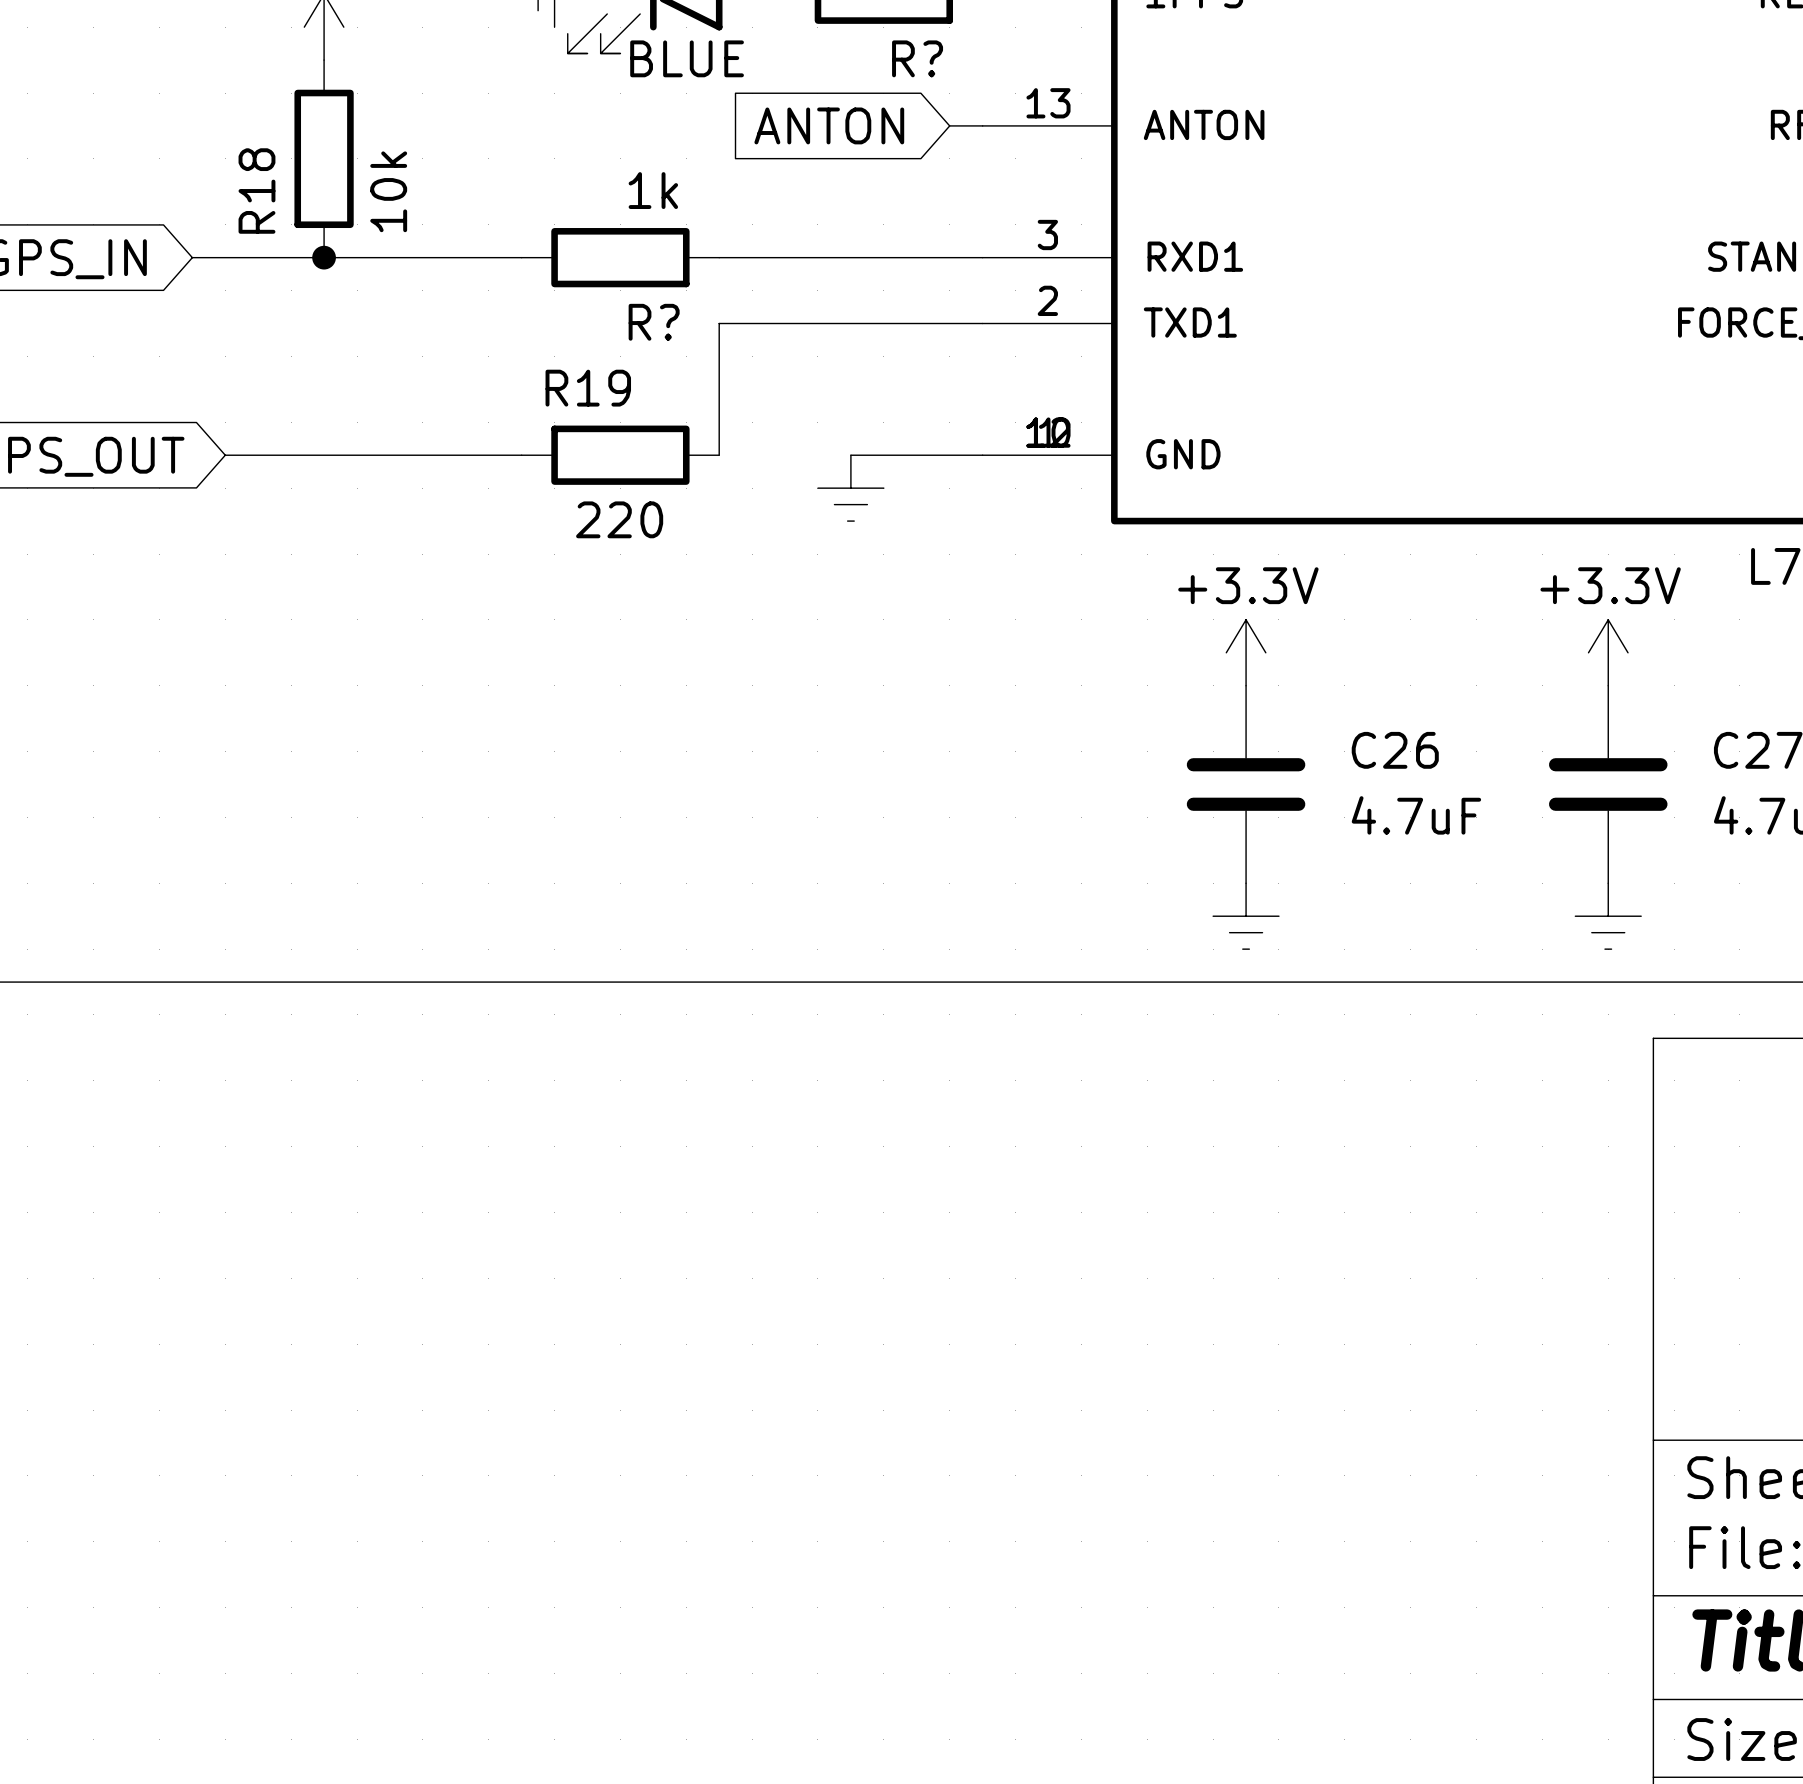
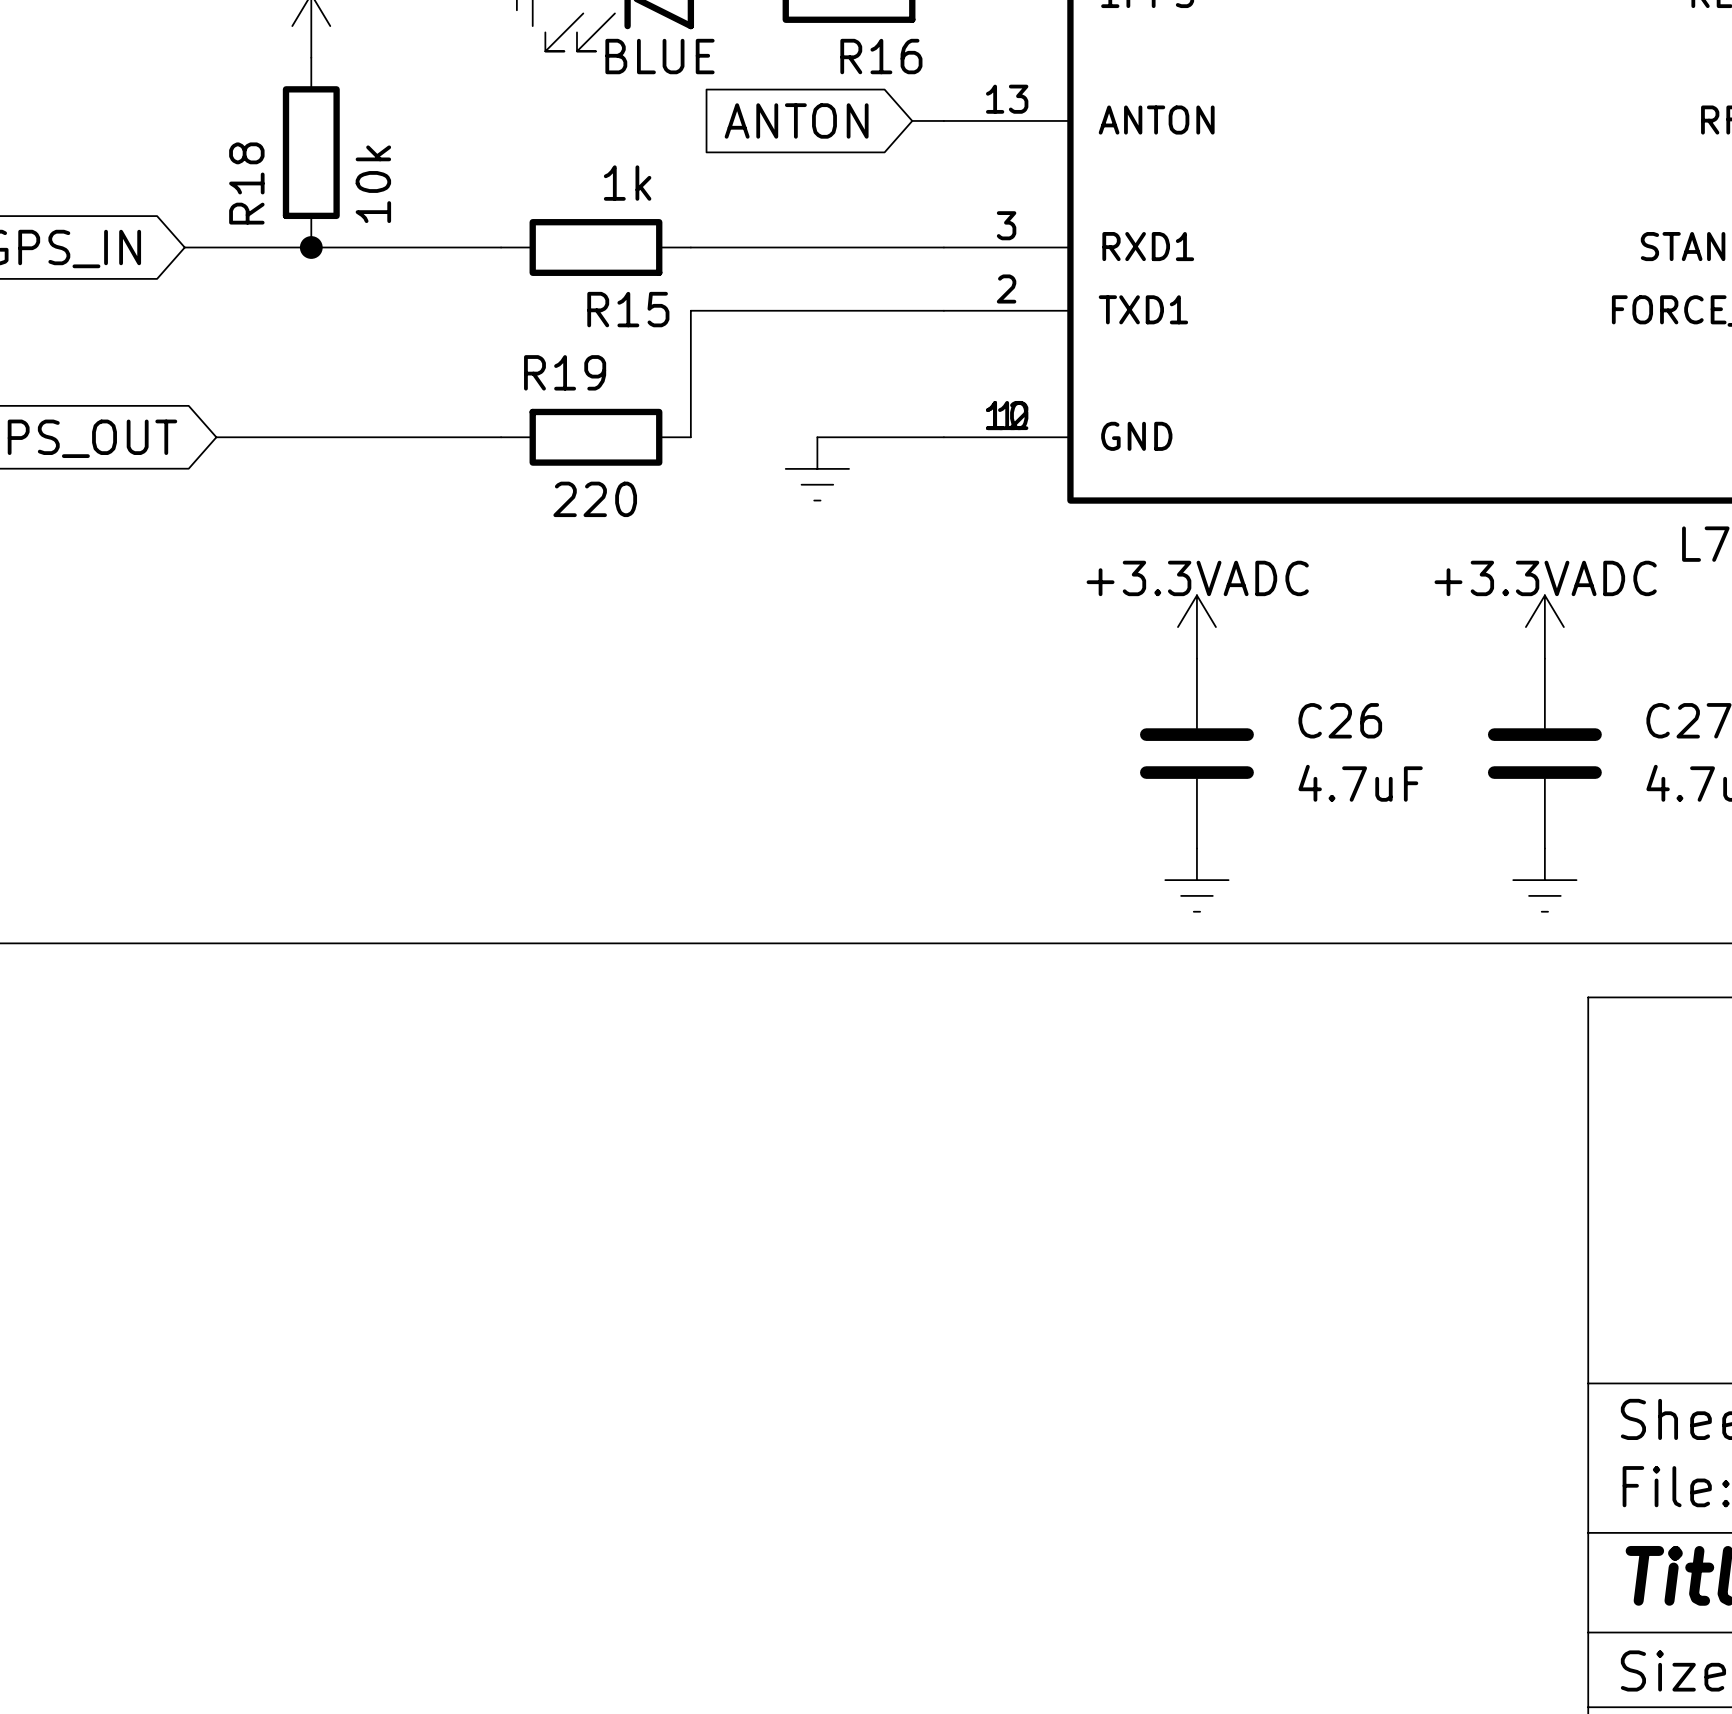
R? name: R? (917, 58) -> R16 (881, 56)
R? name: R? (654, 322) -> R15 (628, 309)
power symbol: +3.3V (1246, 652) -> +3.3VADC (1196, 627)
power symbol: +3.3V (1608, 652) -> +3.3VADC (1544, 627)

